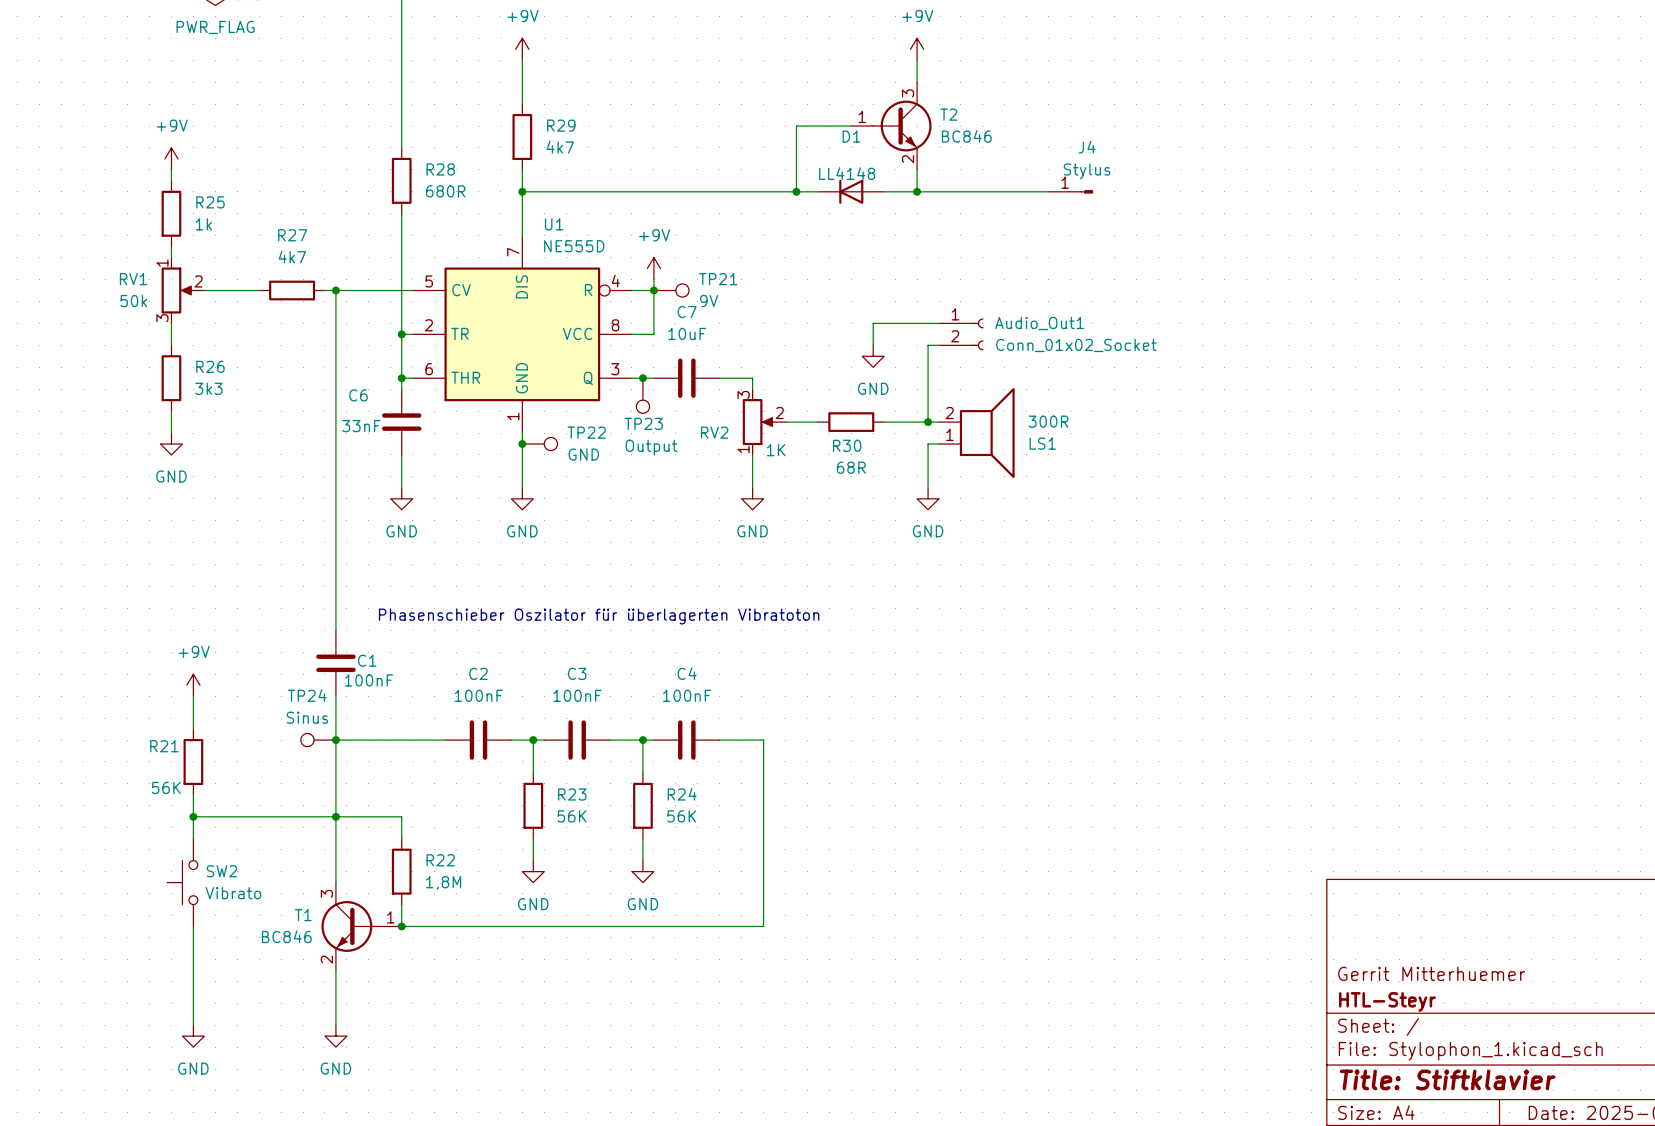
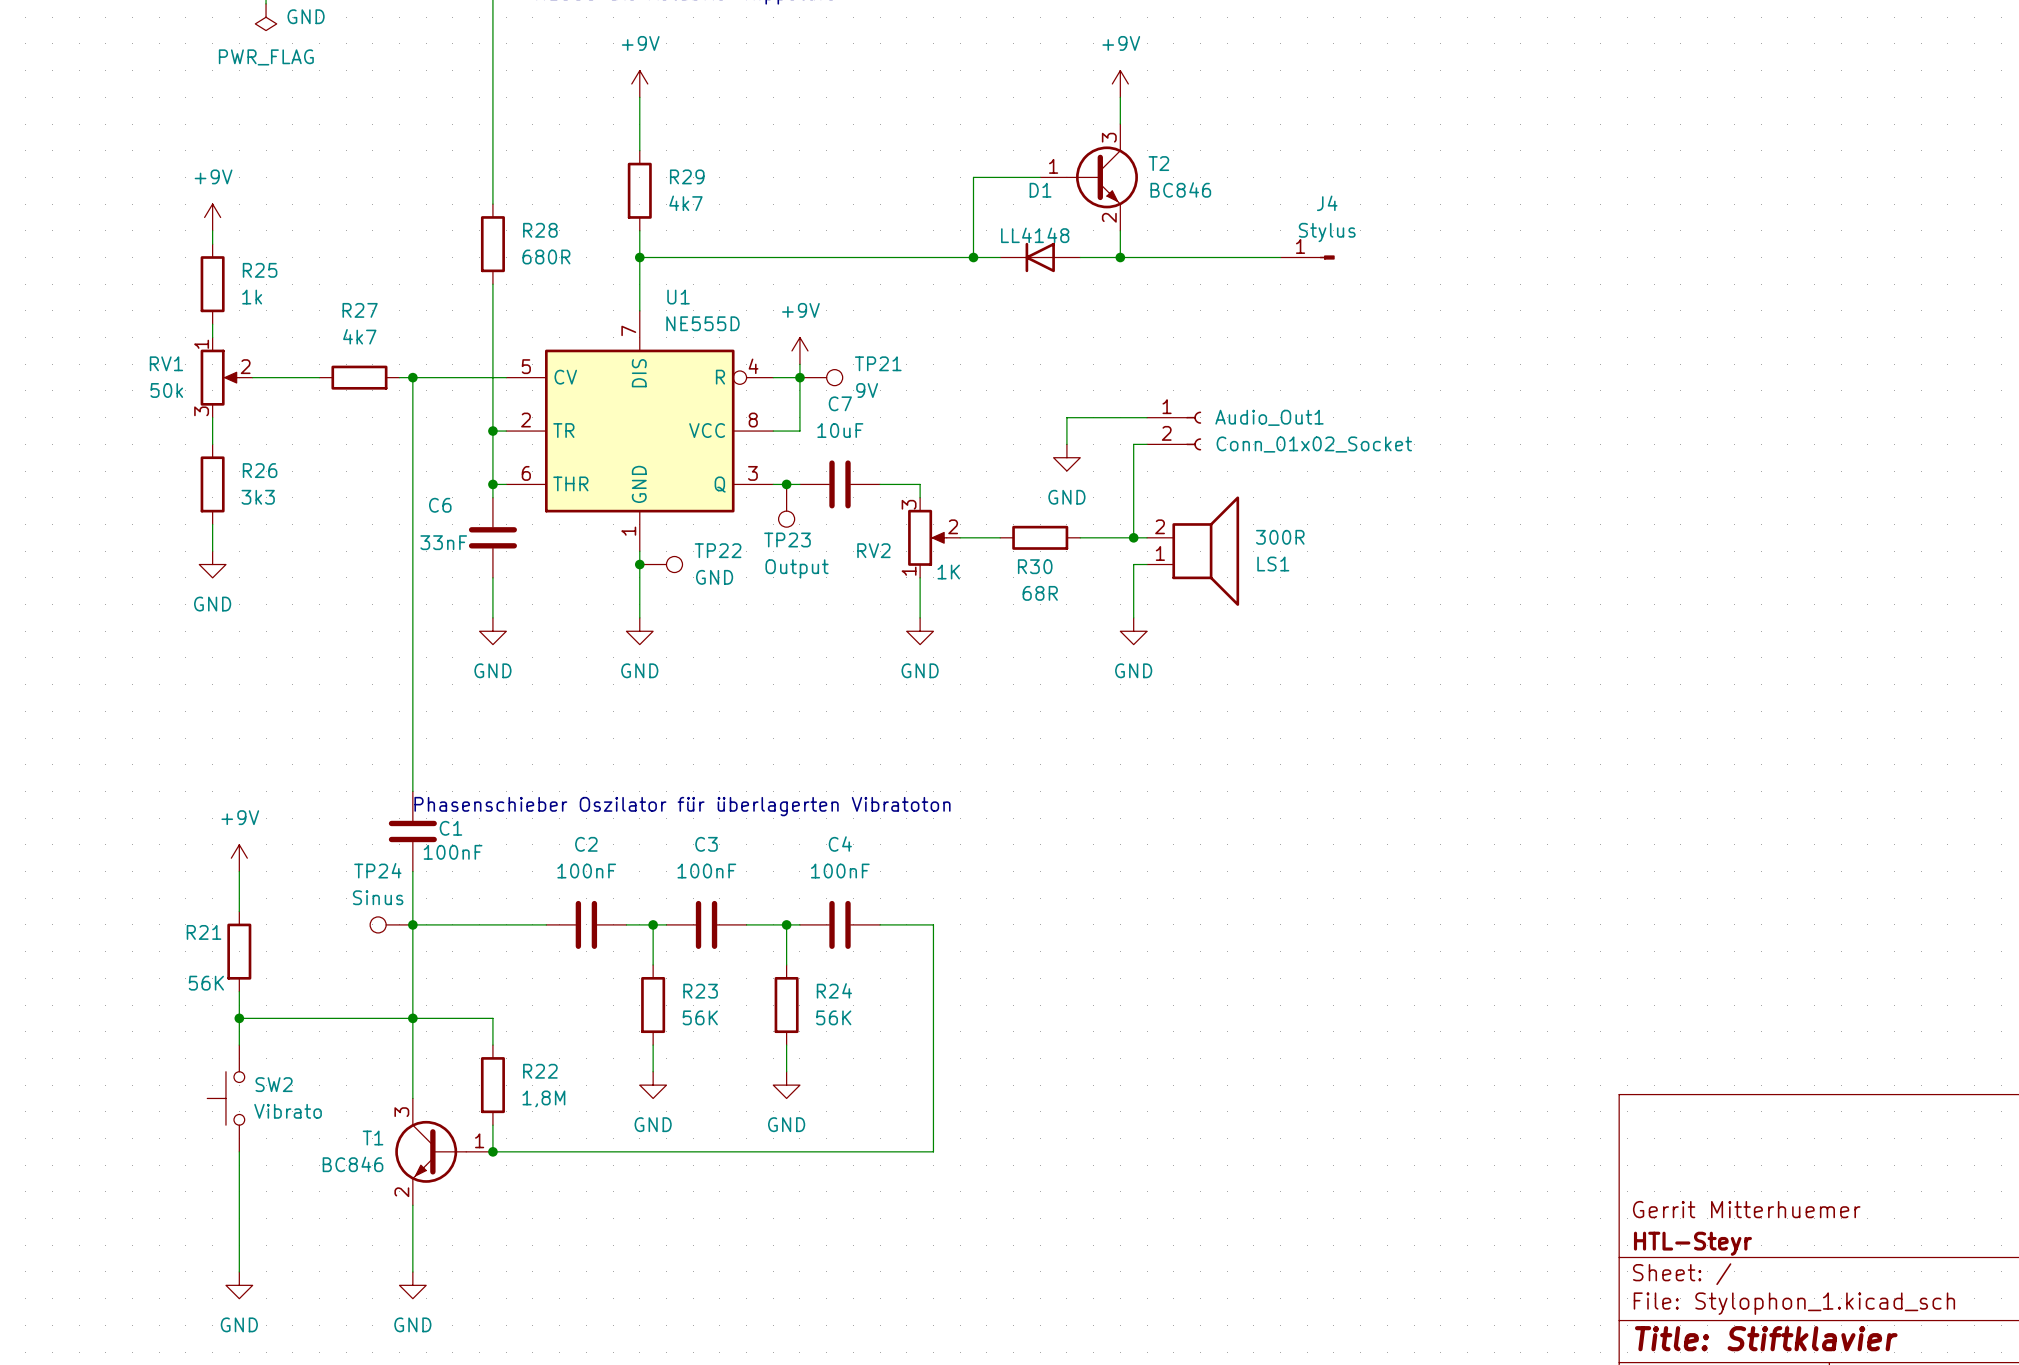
text position: Phasenschieber Oszilator für überlagerten Vibratoton (599, 616) -> Phasenschieber Oszilator für überlagerten Vibratoton (682, 806)

